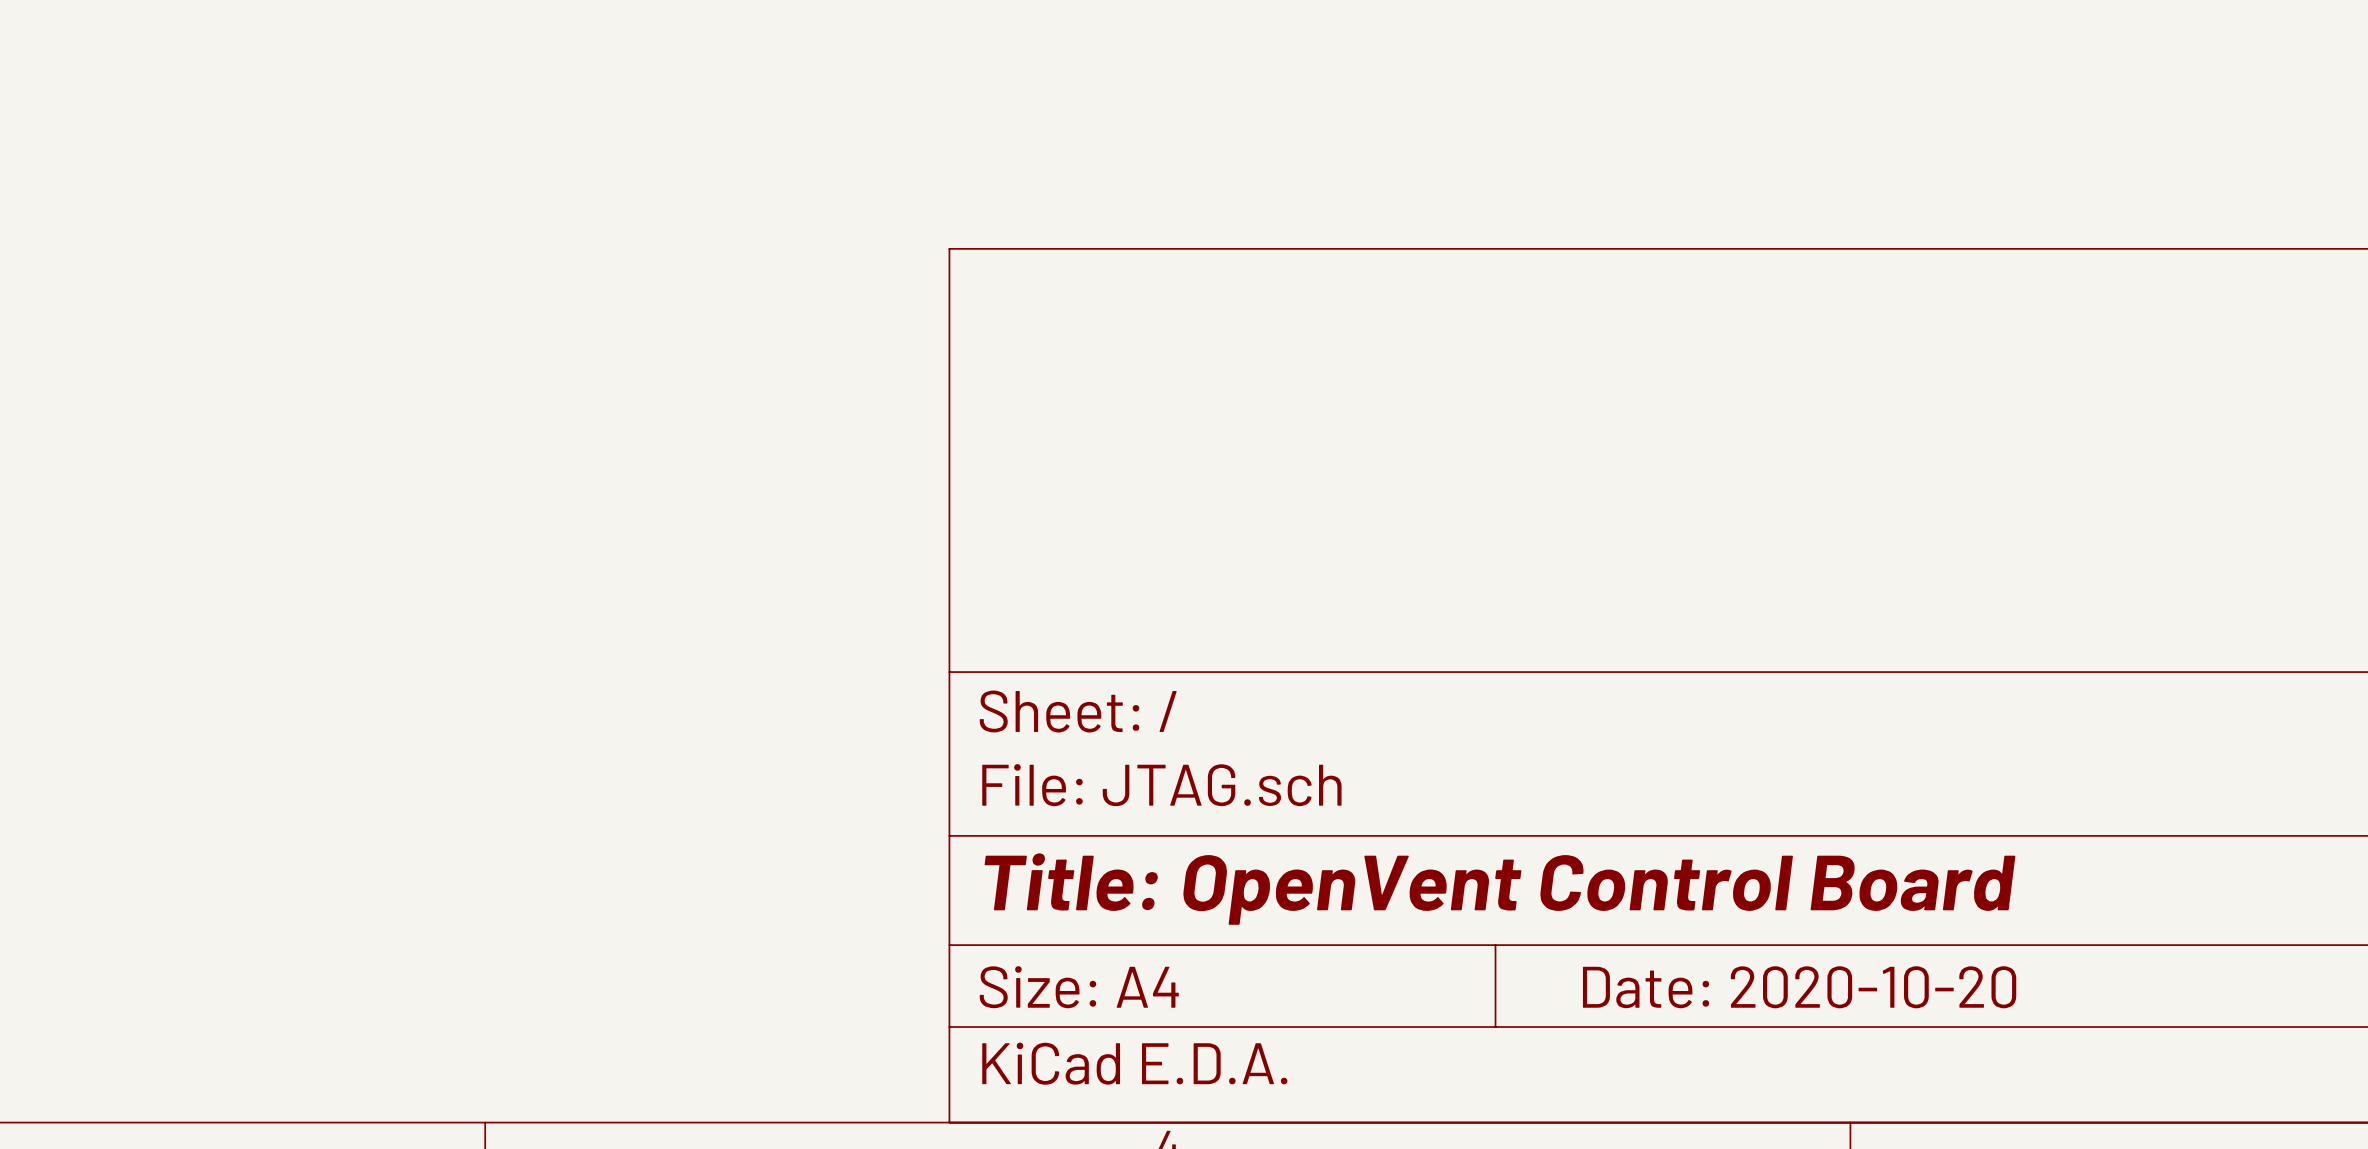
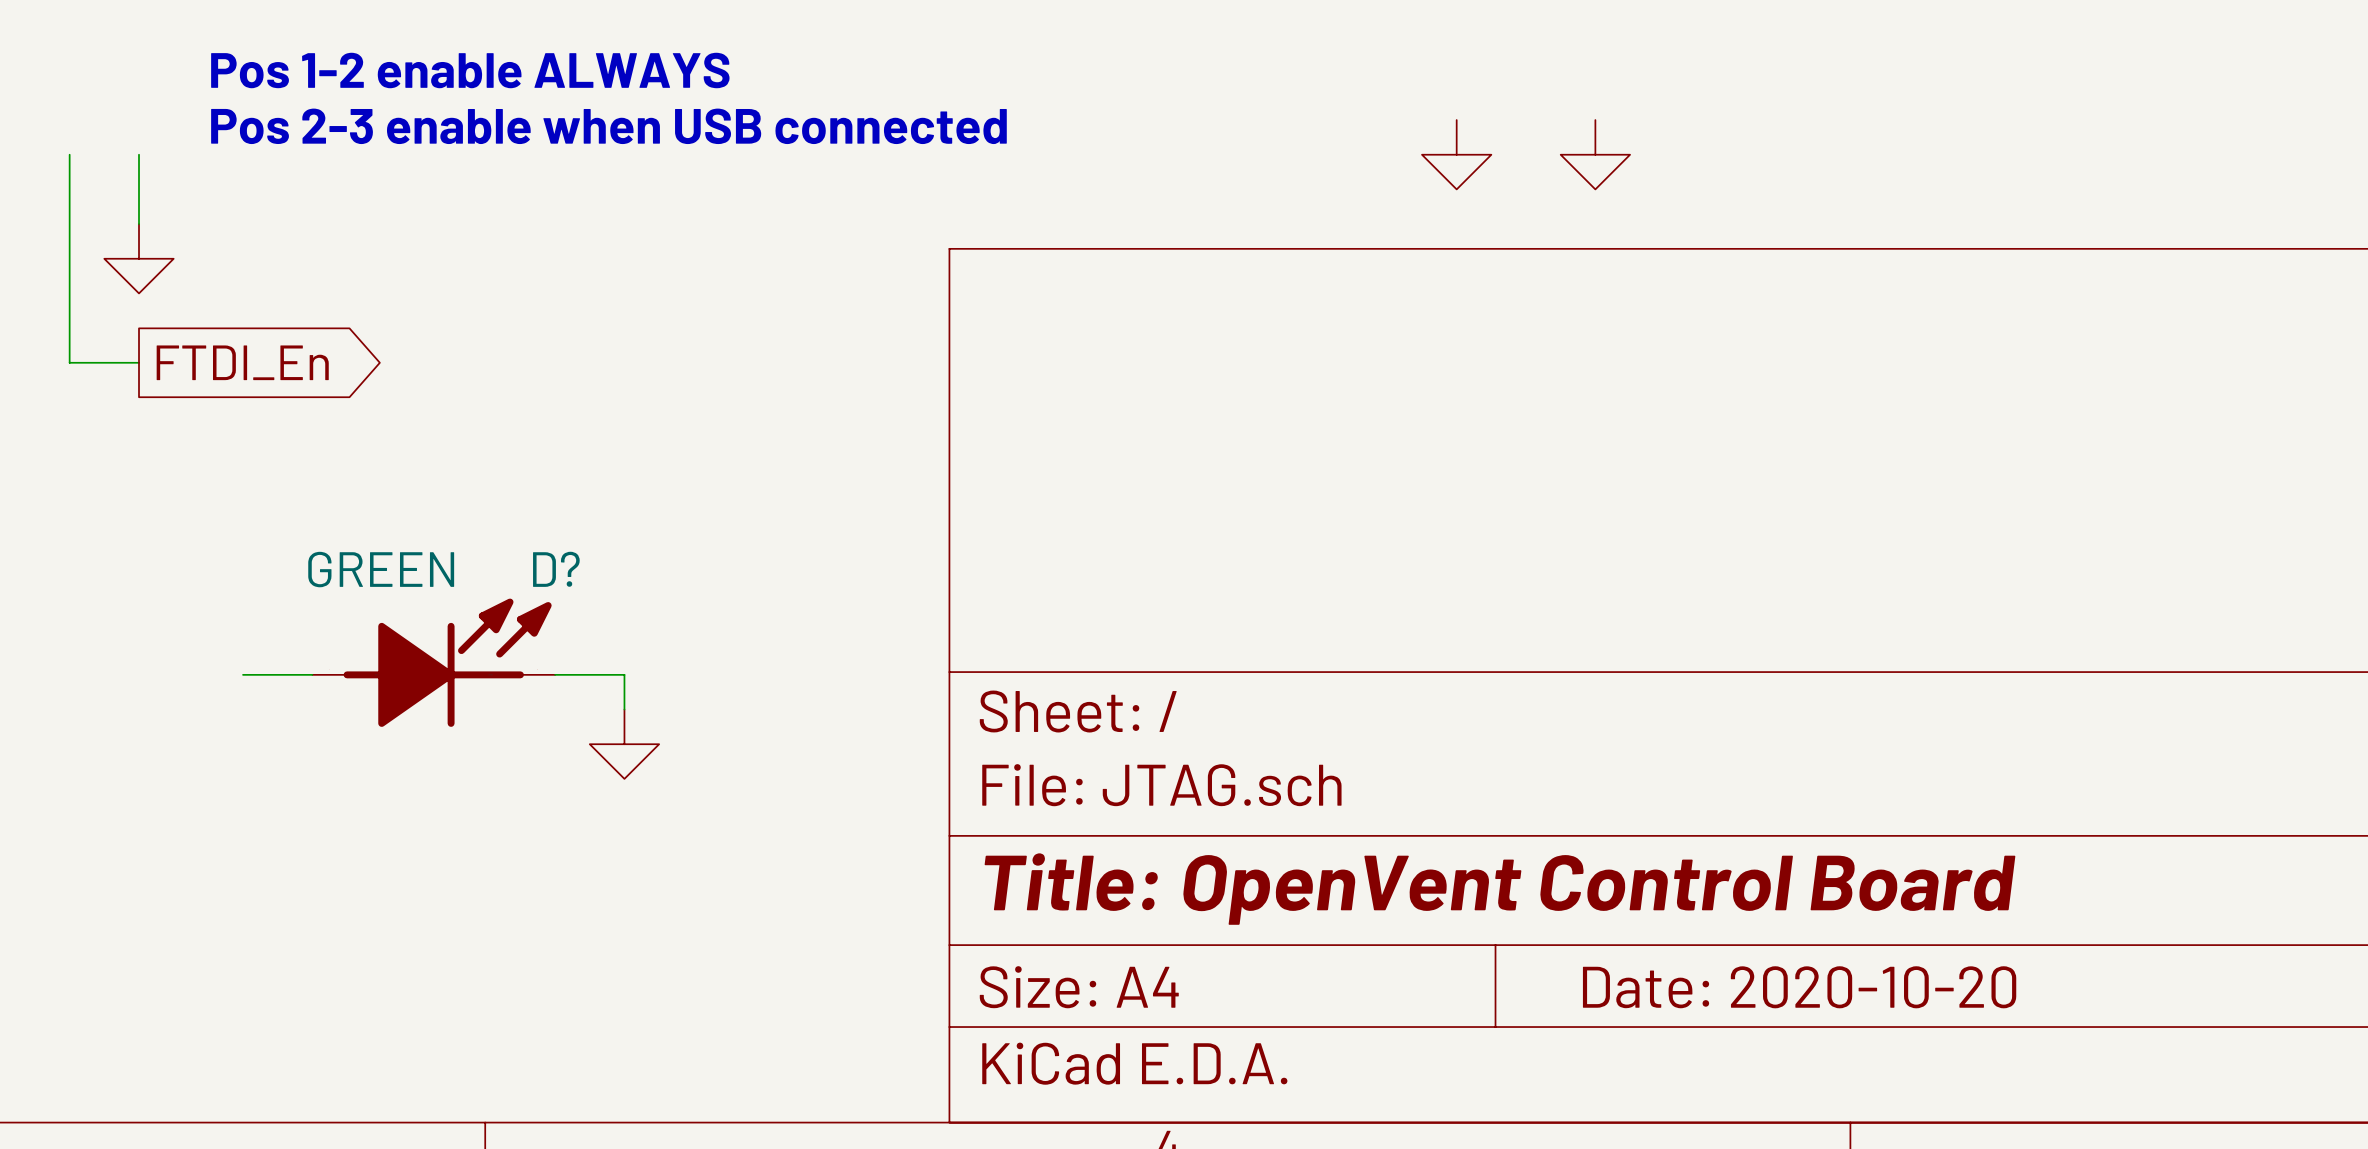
text: none -> Pos 1-2 enable ALWAYS (470, 70)
text: none -> Pos 2-3 enable when USB connected (608, 126)
wire: none -> (69, 154) (69, 362) (139, 362)
wire: none -> (139, 154) (139, 224)
power symbol: none -> (1456, 154)
power symbol: none -> (1595, 154)
power symbol: none -> (139, 258)
global label: none -> FTDI_En (242, 362)
D?: none -> (433, 662)
wire: none -> (243, 674) (312, 674)
wire: none -> (555, 674) (624, 674) (624, 709)
power symbol: none -> (624, 744)

